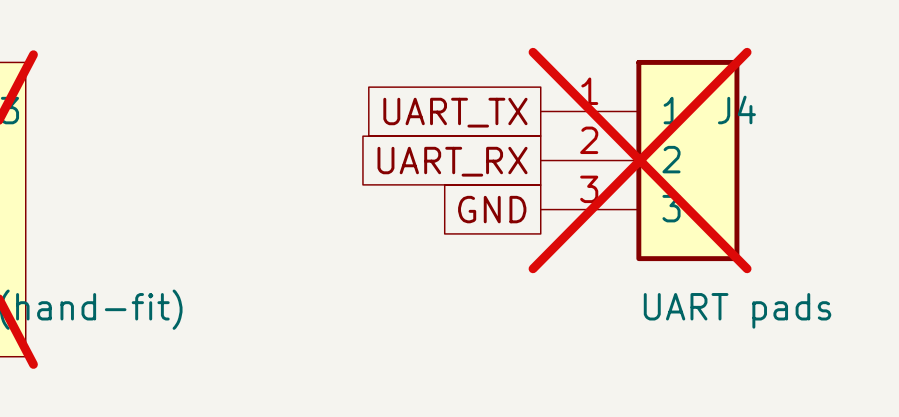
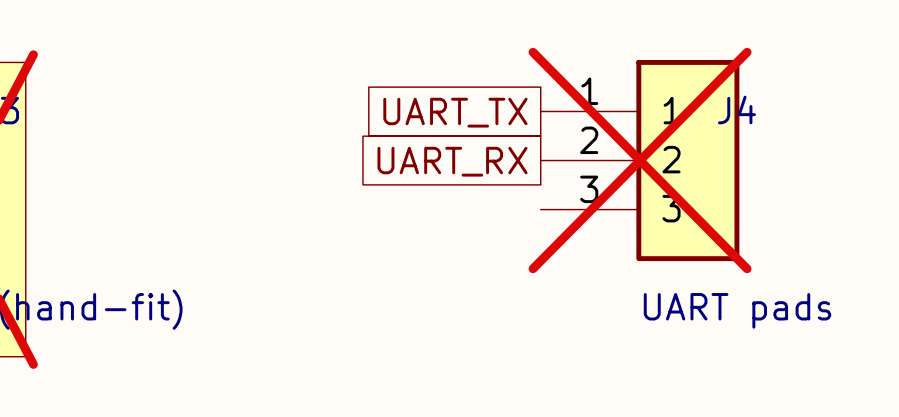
global label: GND (492, 209) -> none

